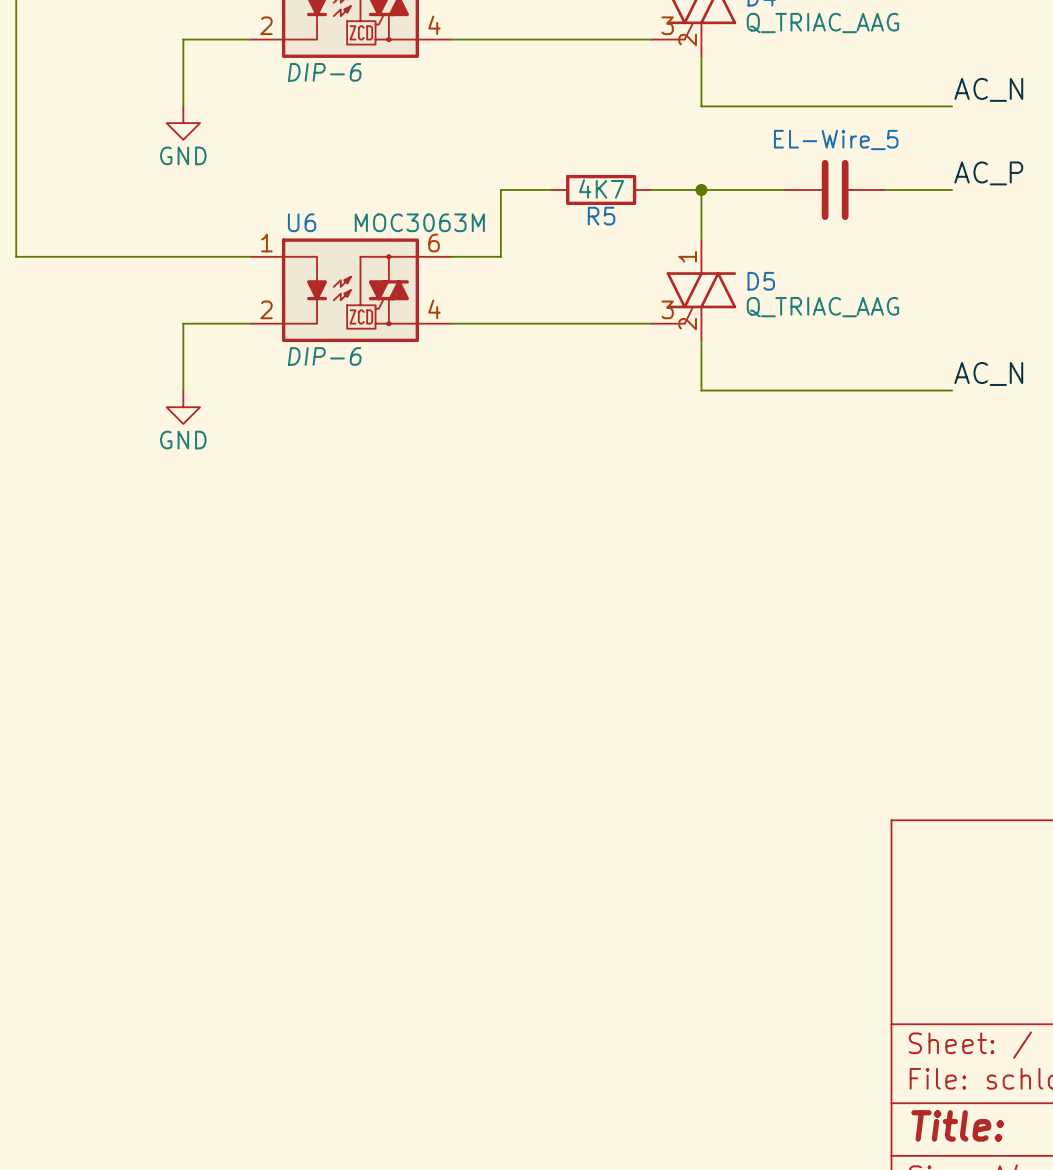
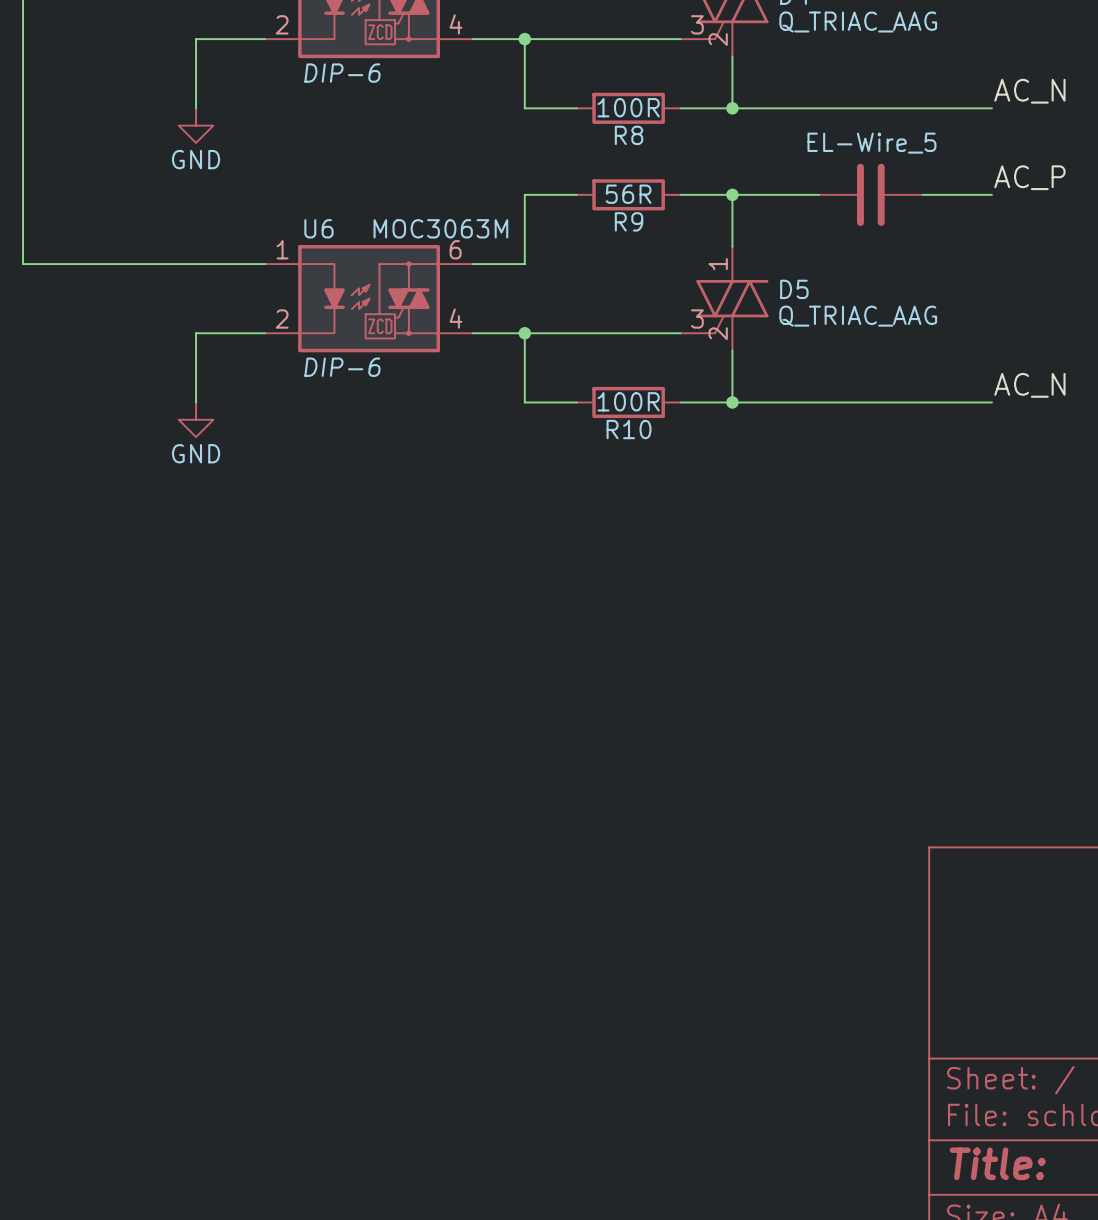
wire: none -> (524, 39) (524, 108) (576, 108)
junction: none -> (524, 39)
R8: none -> 100R (628, 108)
wire: none -> (680, 108) (732, 108)
junction: none -> (732, 108)
R5 value: 4K7 (601, 188) -> 56R (628, 194)
R5 name: R5 (601, 216) -> R9 (629, 221)
wire: none -> (524, 333) (524, 402) (576, 402)
junction: none -> (524, 333)
R10: none -> 100R (628, 402)
wire: none -> (680, 402) (732, 402)
junction: none -> (732, 402)

